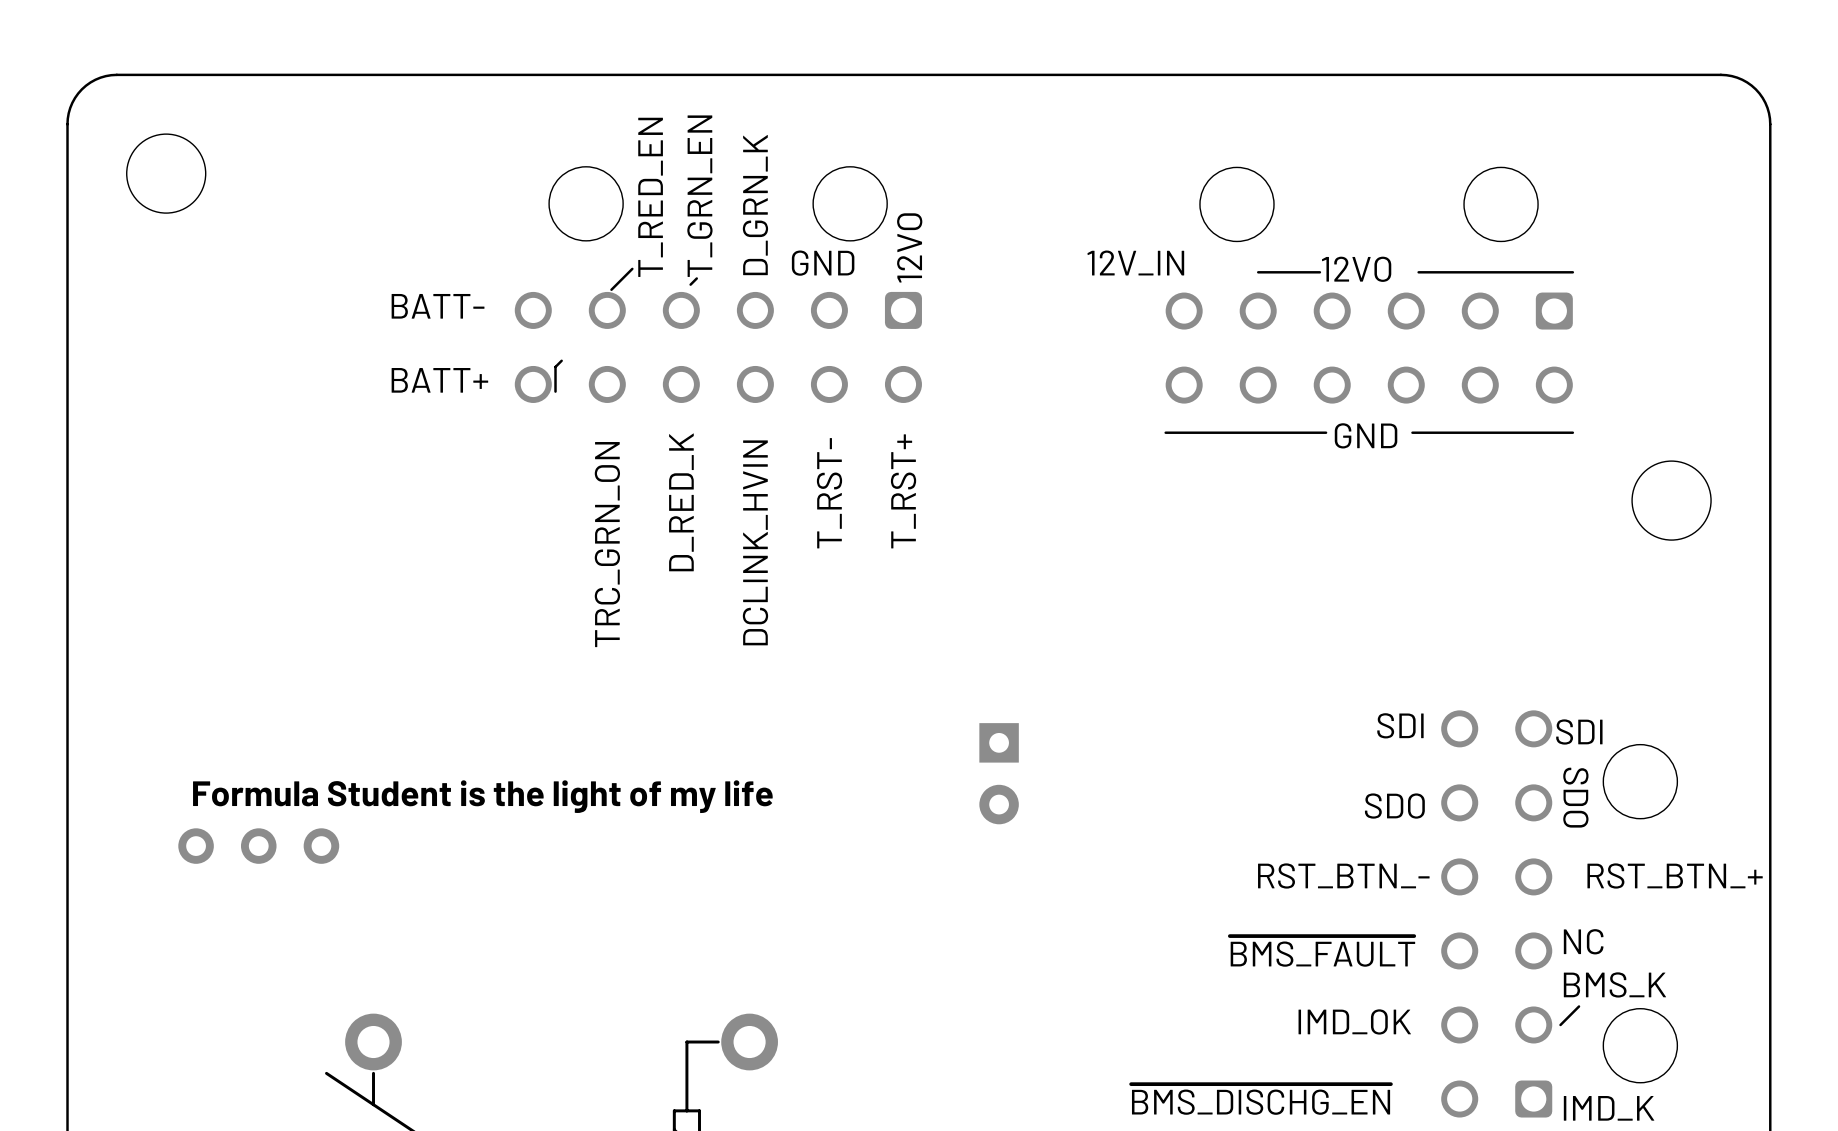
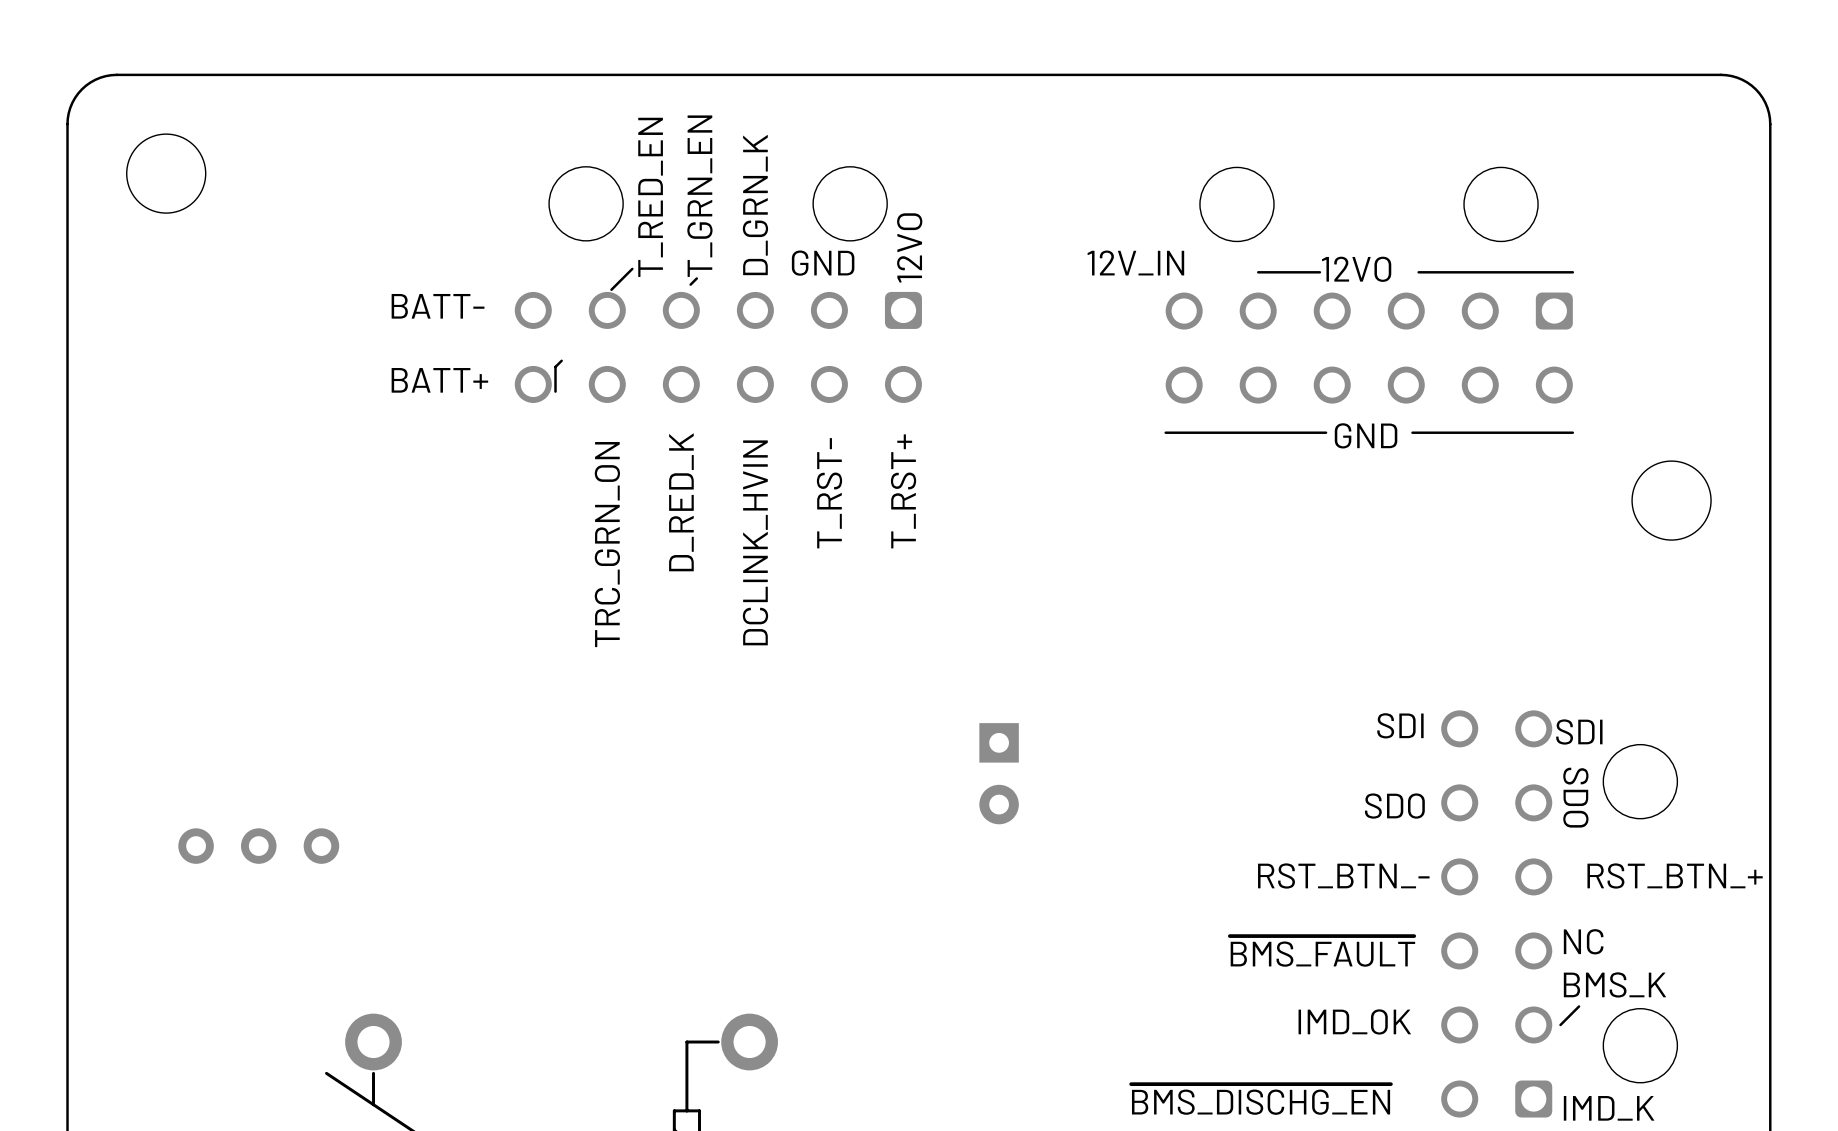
text: Formula Student is the light of my life (482, 796) -> none

